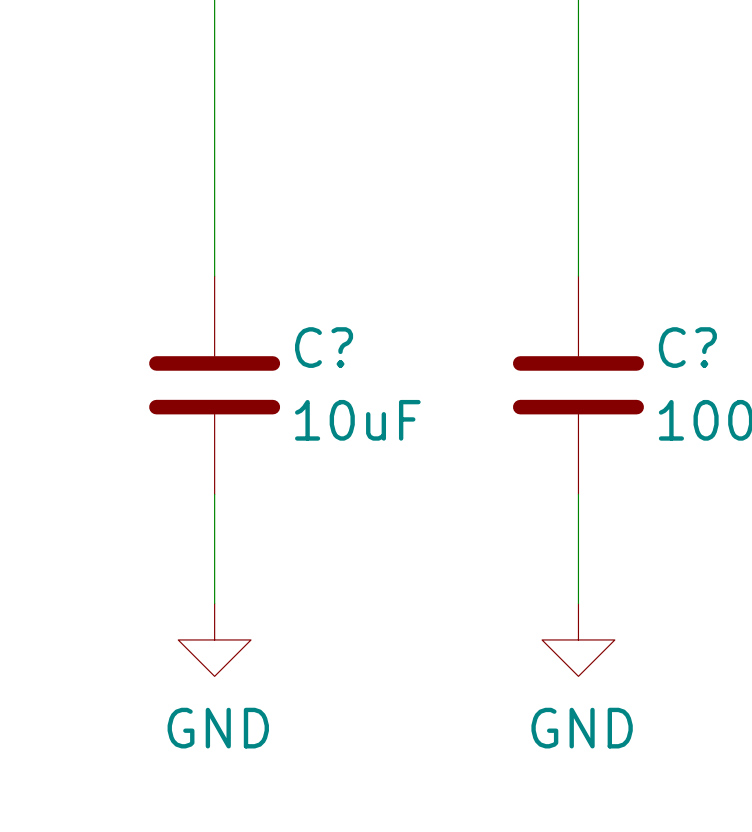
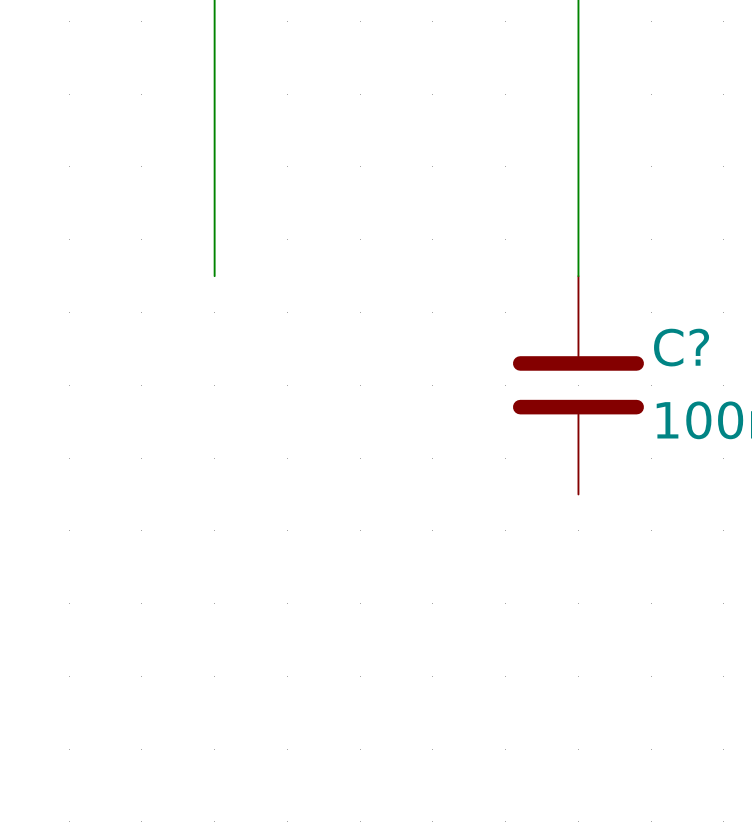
C?: 10uF (214, 385) -> none
wire: (214, 494) (214, 603) -> none
wire: (578, 494) (578, 603) -> none
power symbol: GND (214, 639) -> none
power symbol: GND (578, 639) -> none

